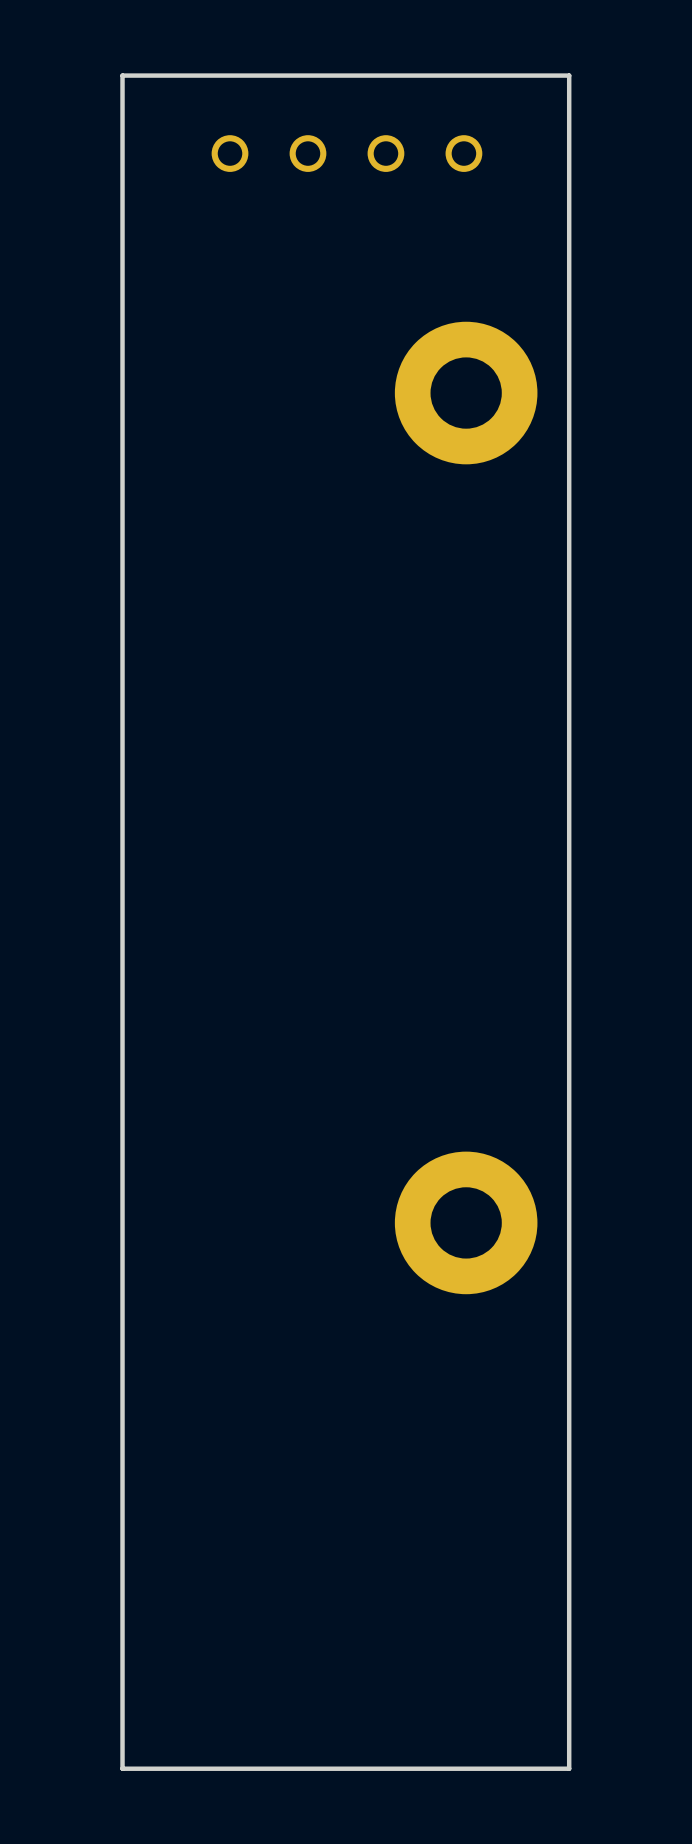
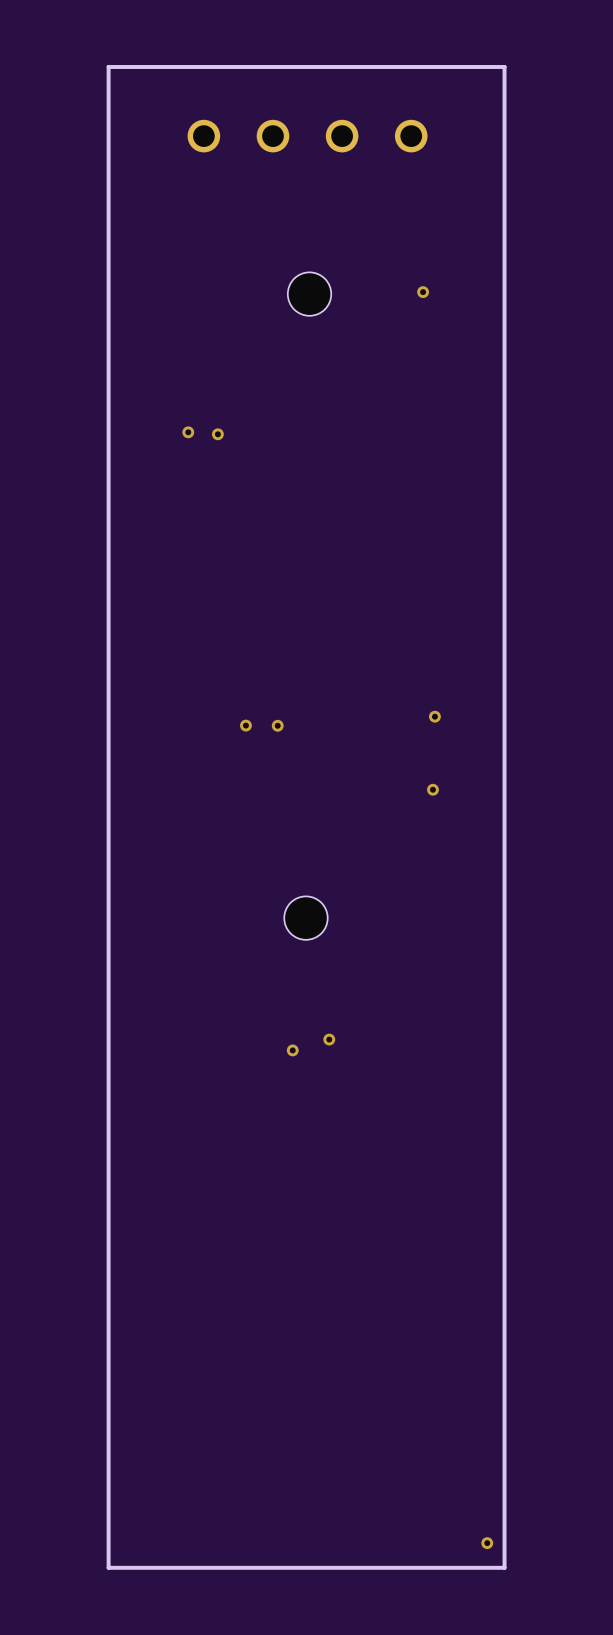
via: none -> (423, 292)
part: none -> (309, 294)
part: (466, 393) -> none
via: none -> (188, 432)
via: none -> (217, 434)
via: none -> (434, 716)
via: none -> (245, 725)
via: none -> (277, 725)
via: none -> (432, 789)
part: none -> (305, 918)
via: none -> (329, 1039)
via: none -> (292, 1050)
part: (466, 1222) -> none
via: none -> (487, 1543)

